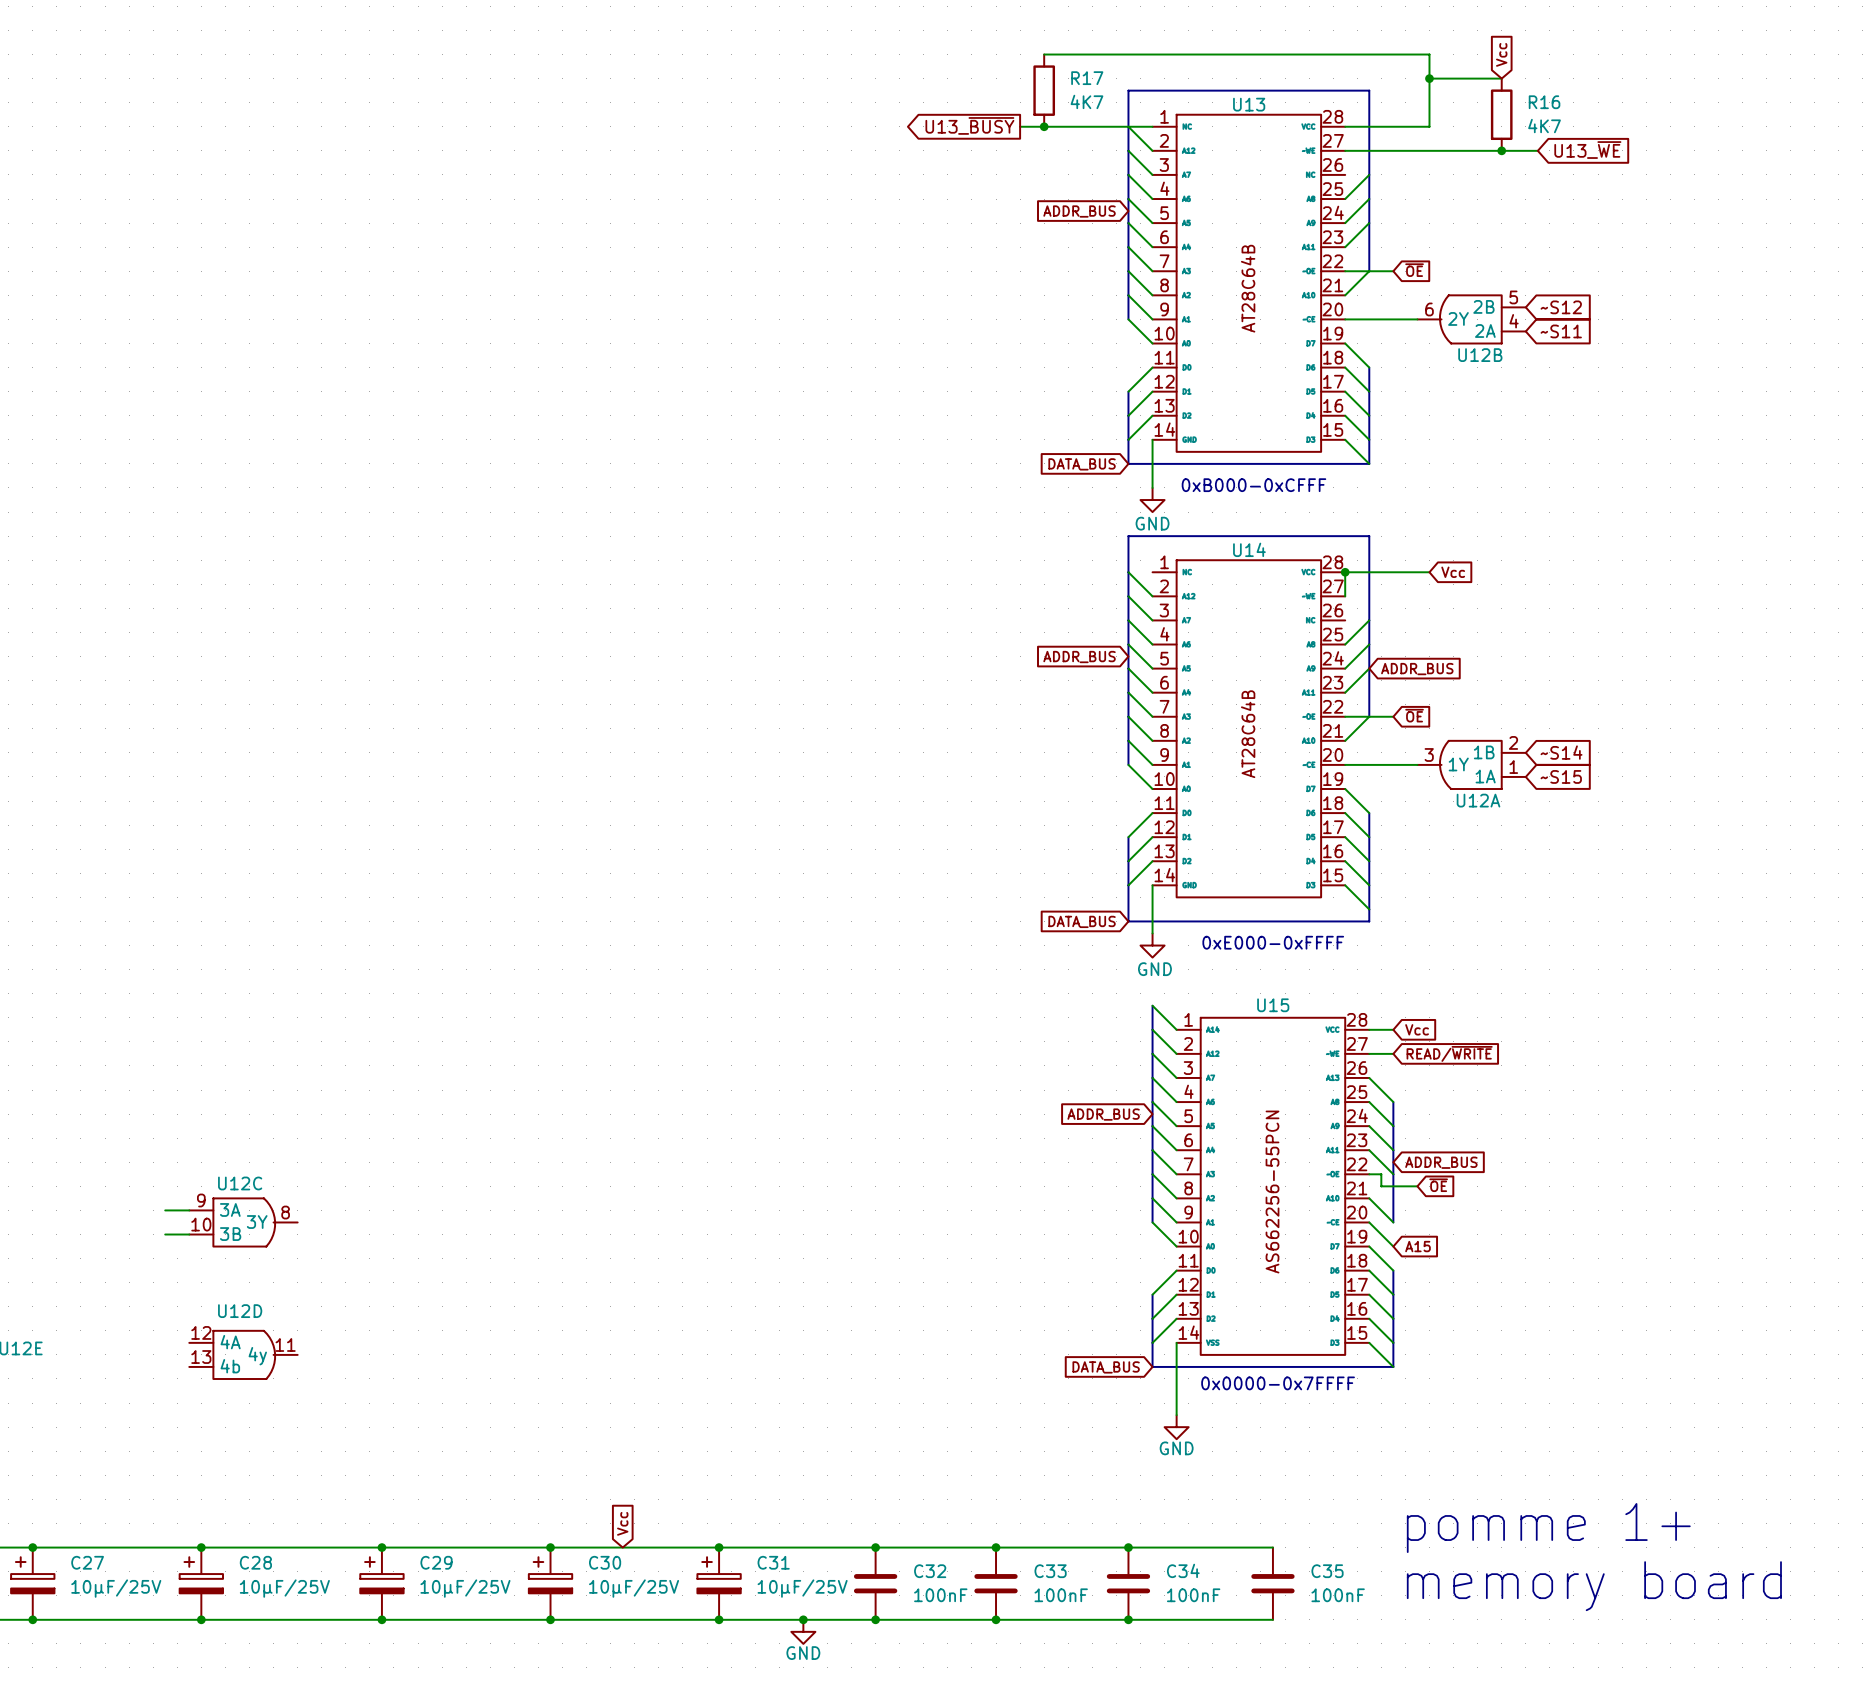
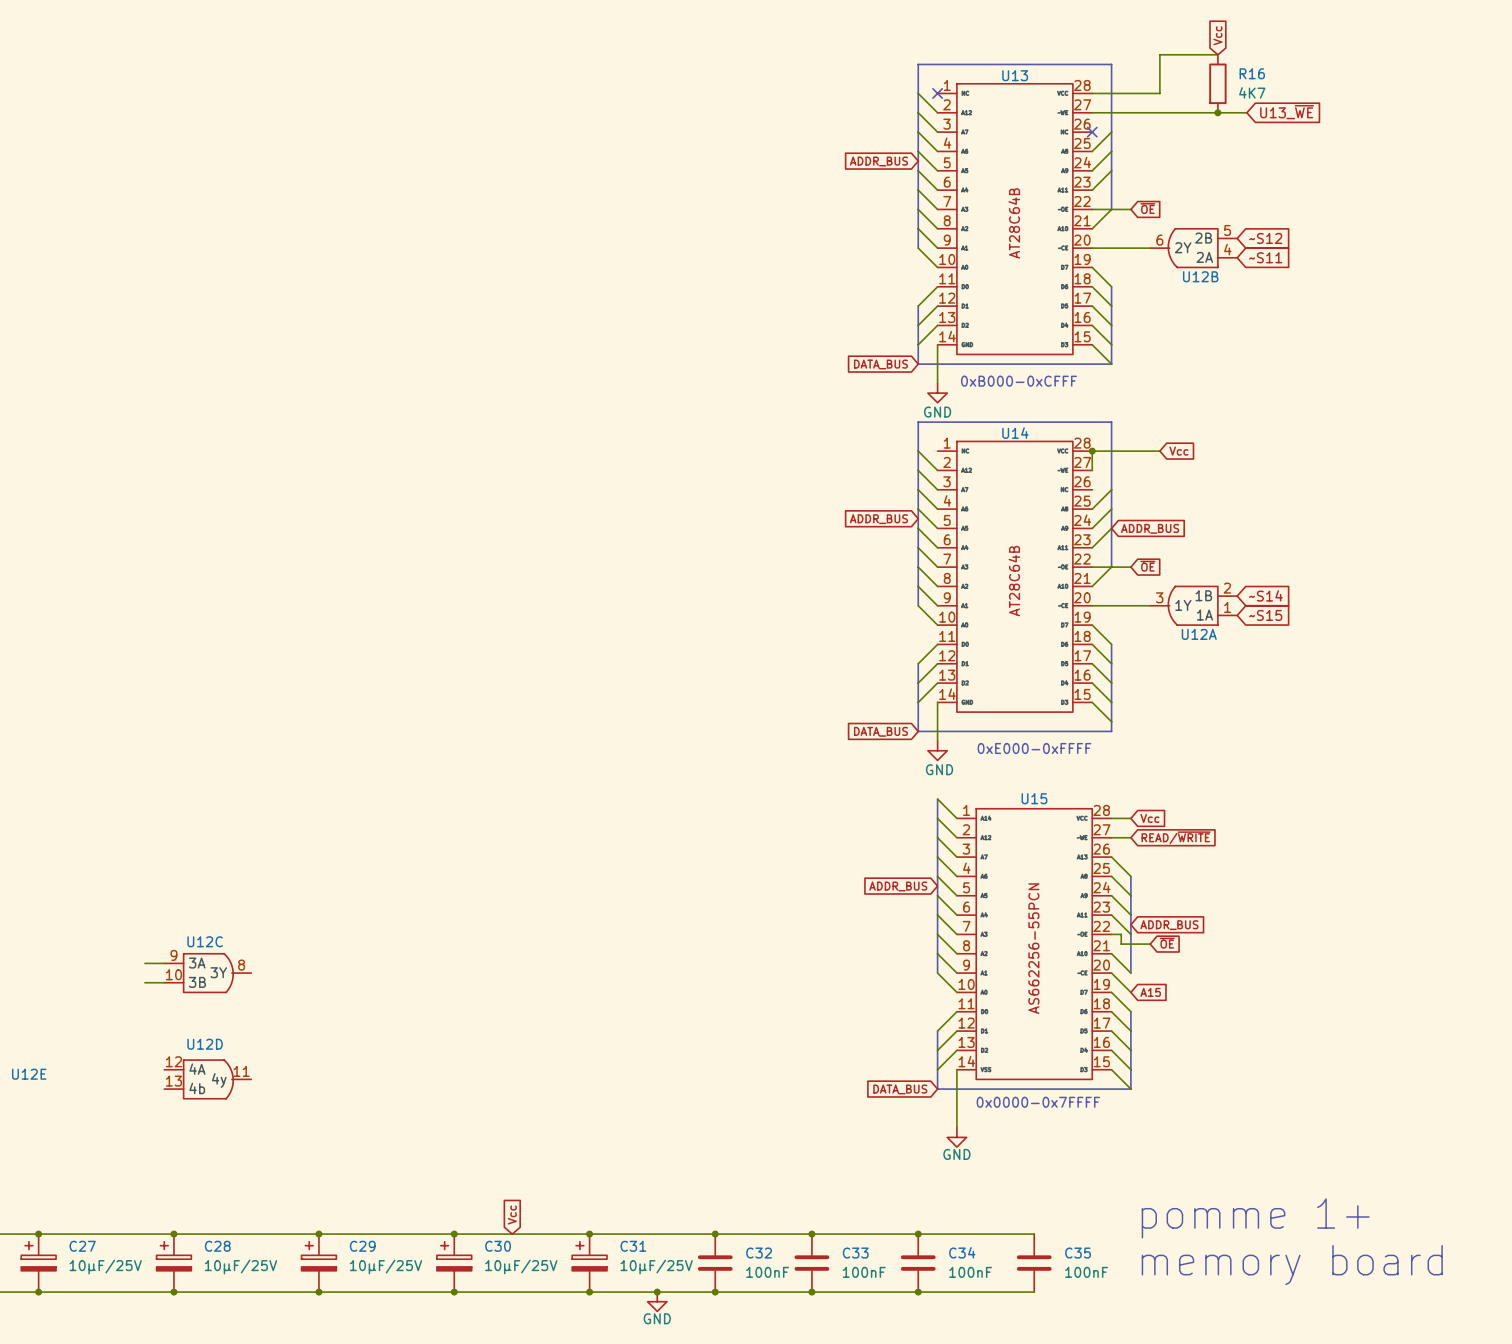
wire: (1044, 54) (1429, 54) (1429, 78) -> none
junction: (1429, 78) -> none
R17: 4K7 (1044, 90) -> none
global label: U13_~{BUSY} (969, 125) -> none
wire: (1020, 126) (1152, 126) -> none
junction: (1044, 126) -> none
no-connect mark: none -> (937, 93)
no-connect mark: none -> (1092, 132)

